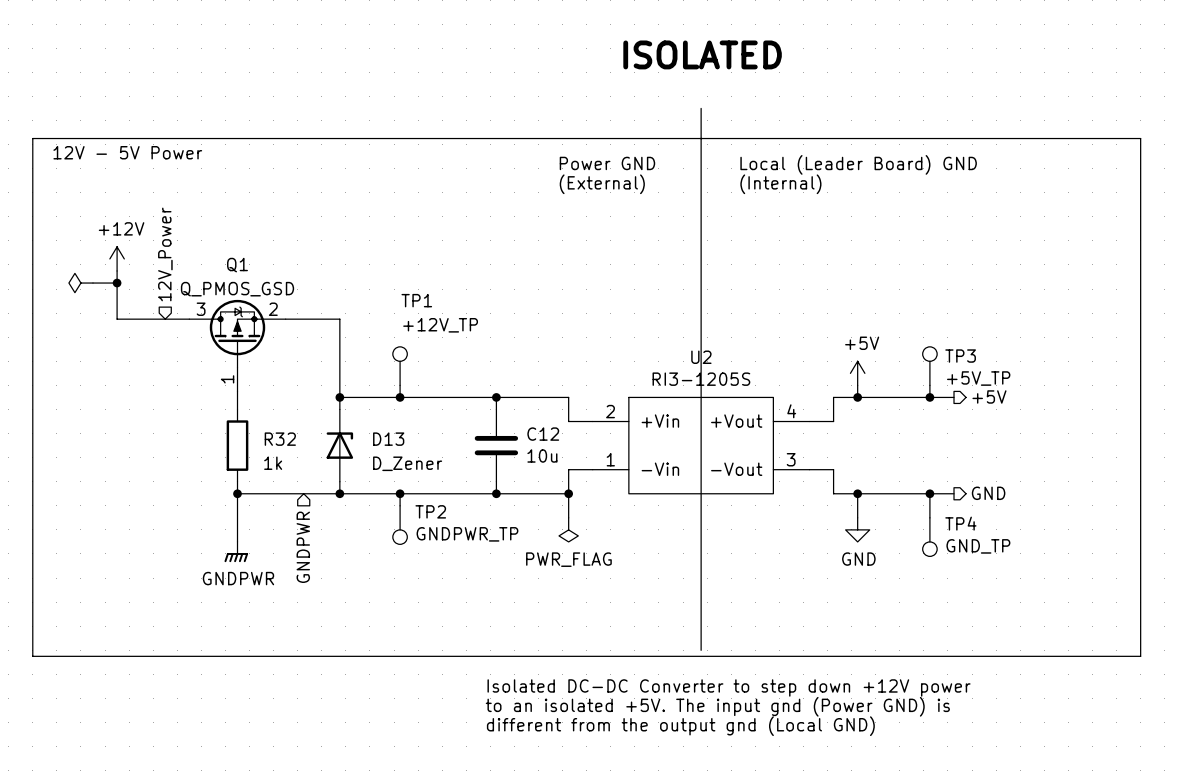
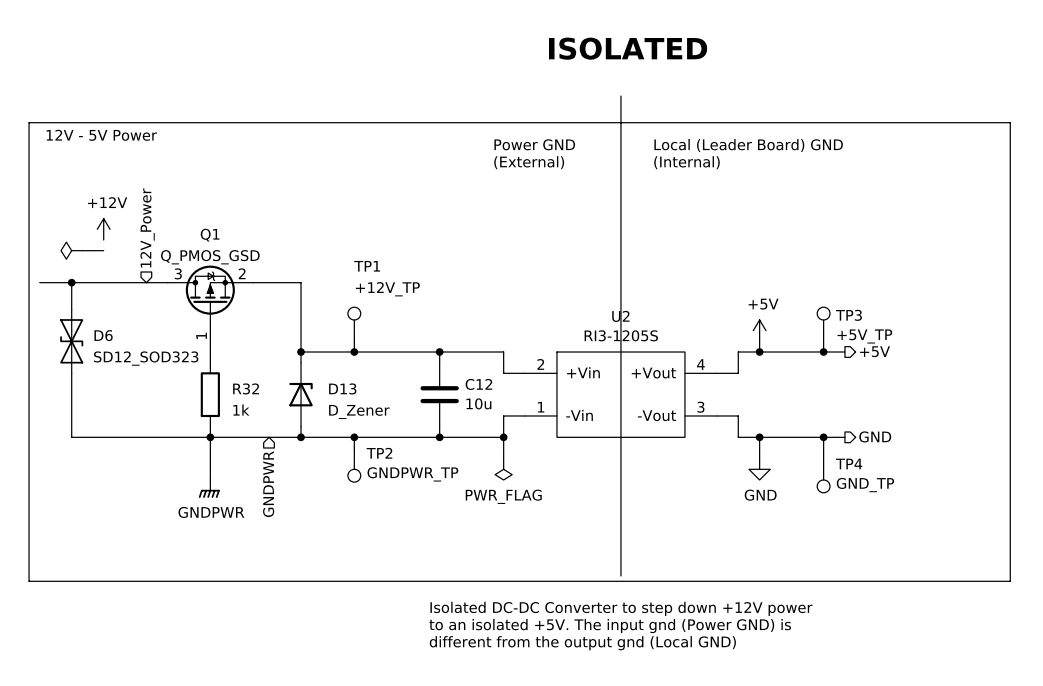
wire: (117, 270) (117, 319) -> (39, 282) (103, 282)
junction position: (117, 283) -> (71, 282)
wire: none -> (71, 282) (71, 309)
D6: none -> SD12_SOD323 (71, 341)
wire: none -> (71, 373) (71, 437) (210, 437)

